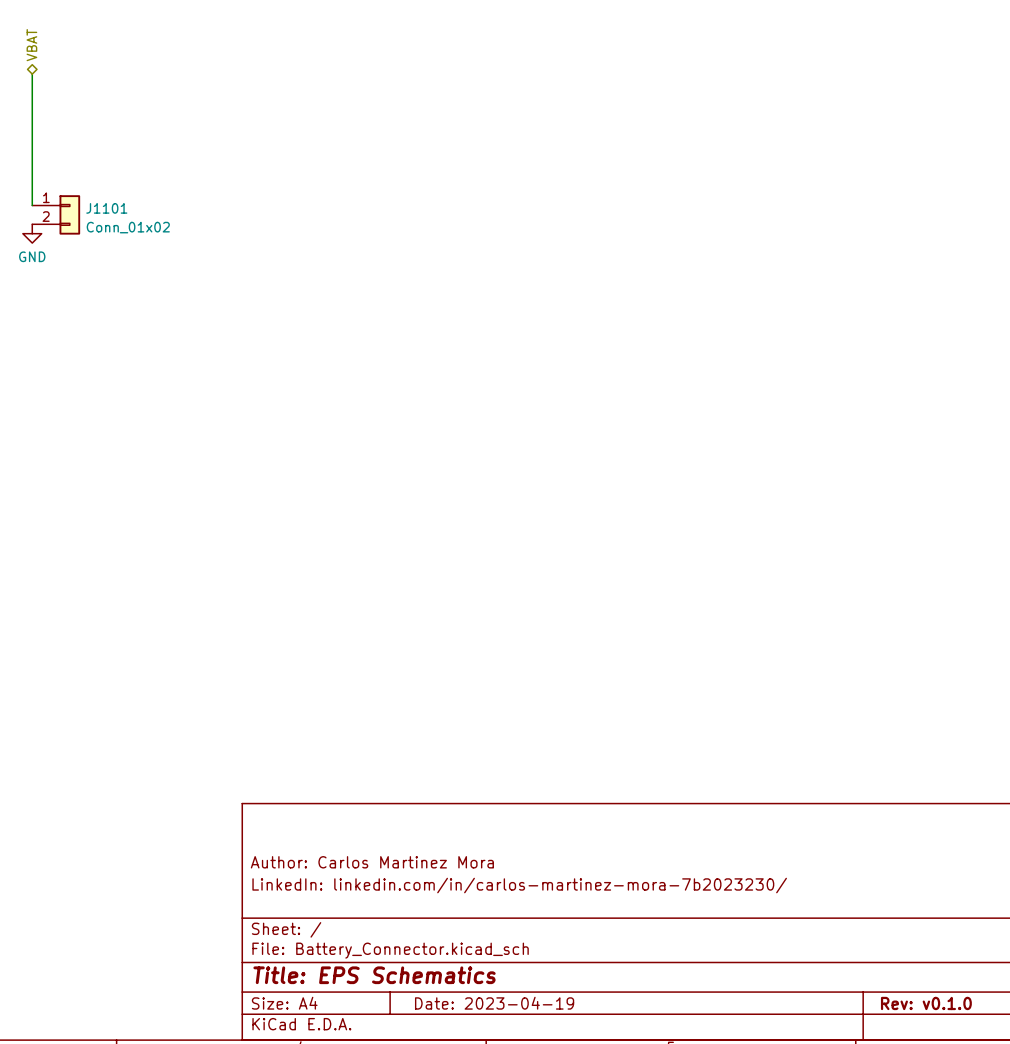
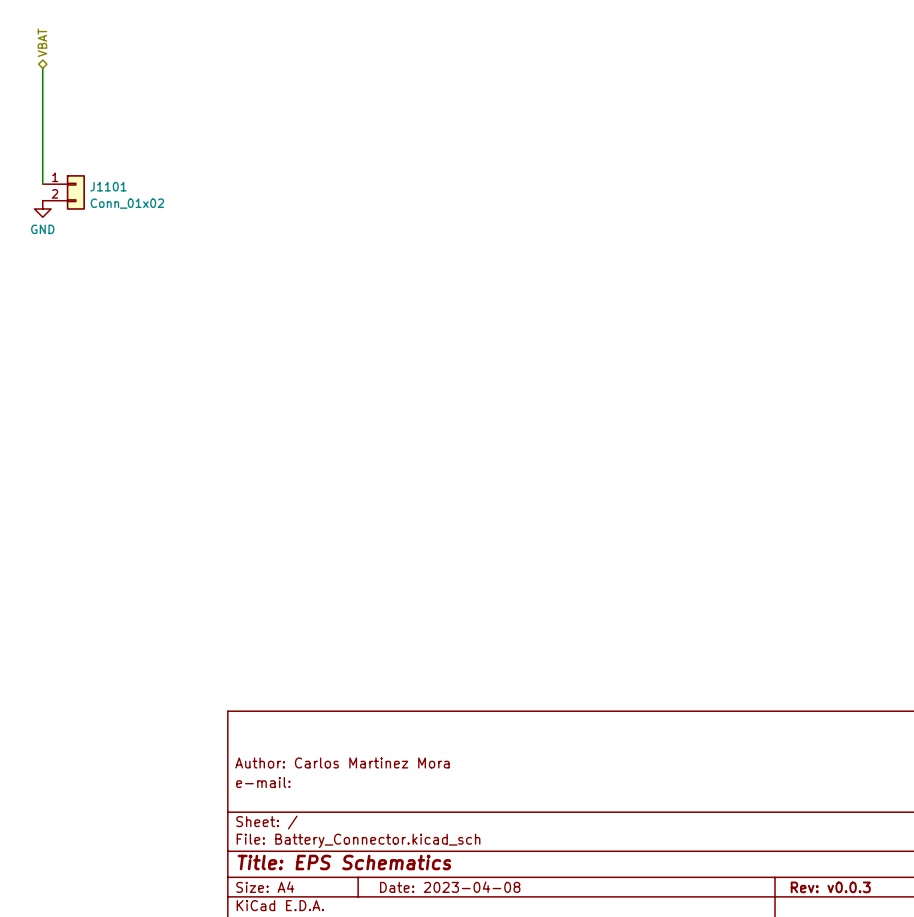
title block: LinkedIn: linkedin.com/in/carlos-martinez-mora-7b2023230/ (519, 885) -> e-mail: (263, 782)
title block: Date: 2023-04-19 (494, 1003) -> Date: 2023-04-08 (450, 887)
title block: Rev: v0.1.0 (926, 1003) -> Rev: v0.0.3 (830, 887)

